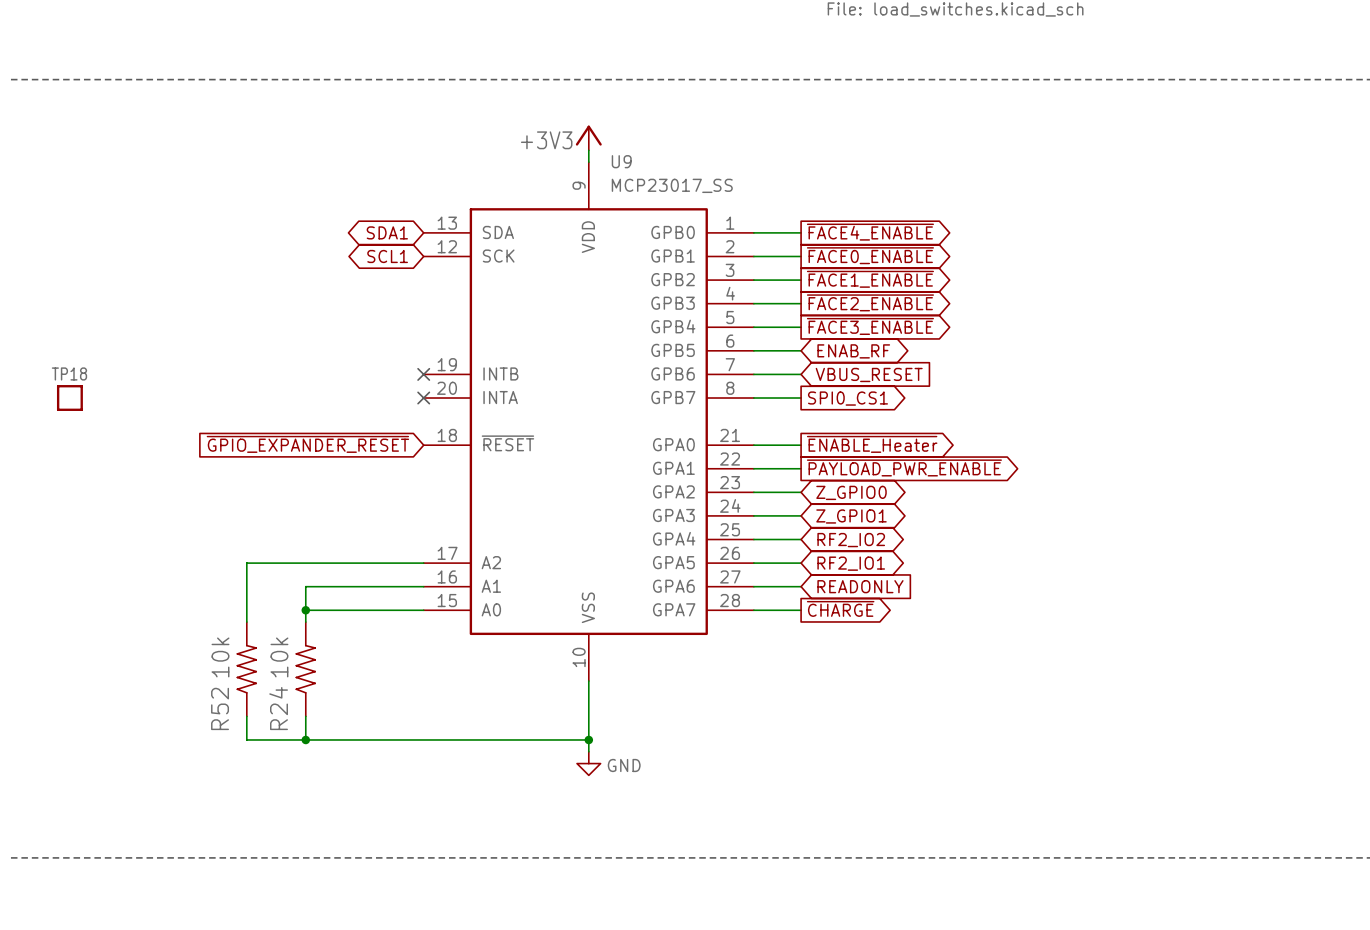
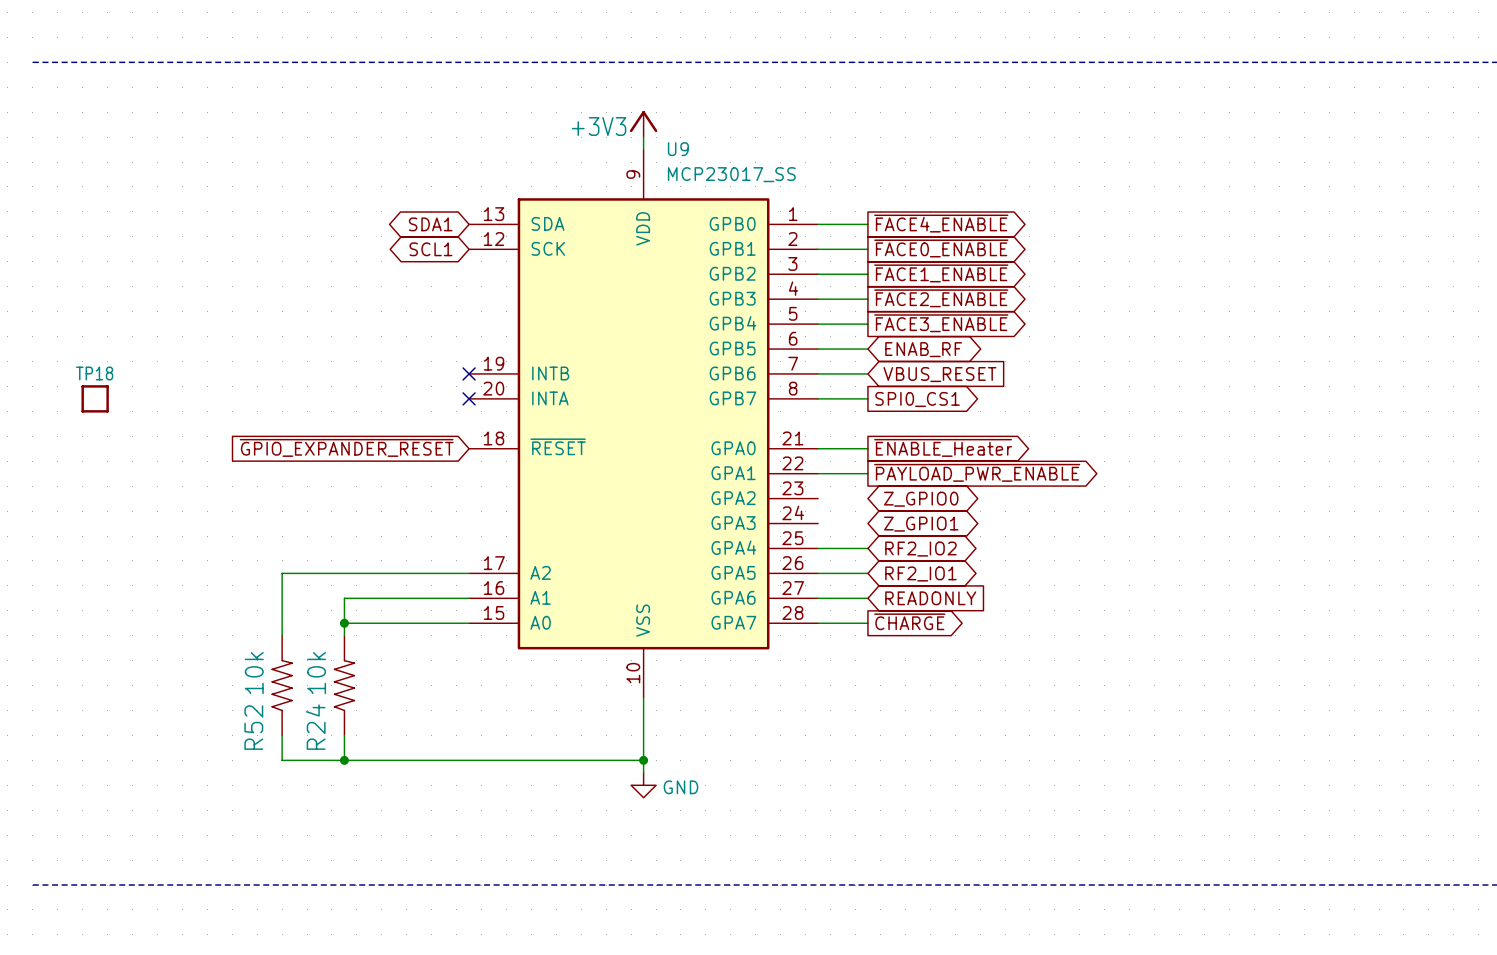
wire: (753, 492) (801, 492) -> none
wire: (753, 515) (801, 515) -> none

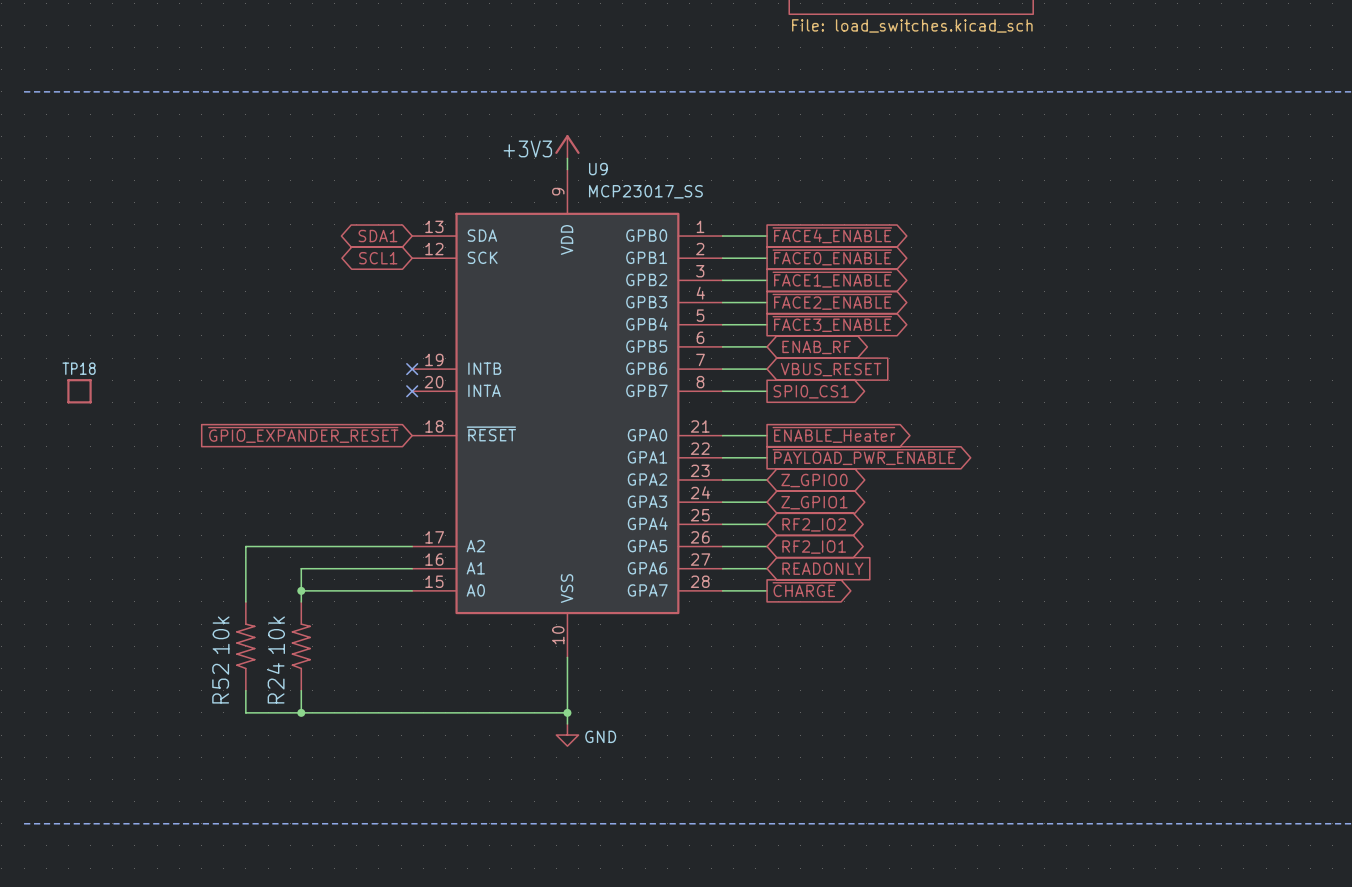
wire: none -> (722, 479) (767, 479)
wire: none -> (722, 502) (767, 502)

